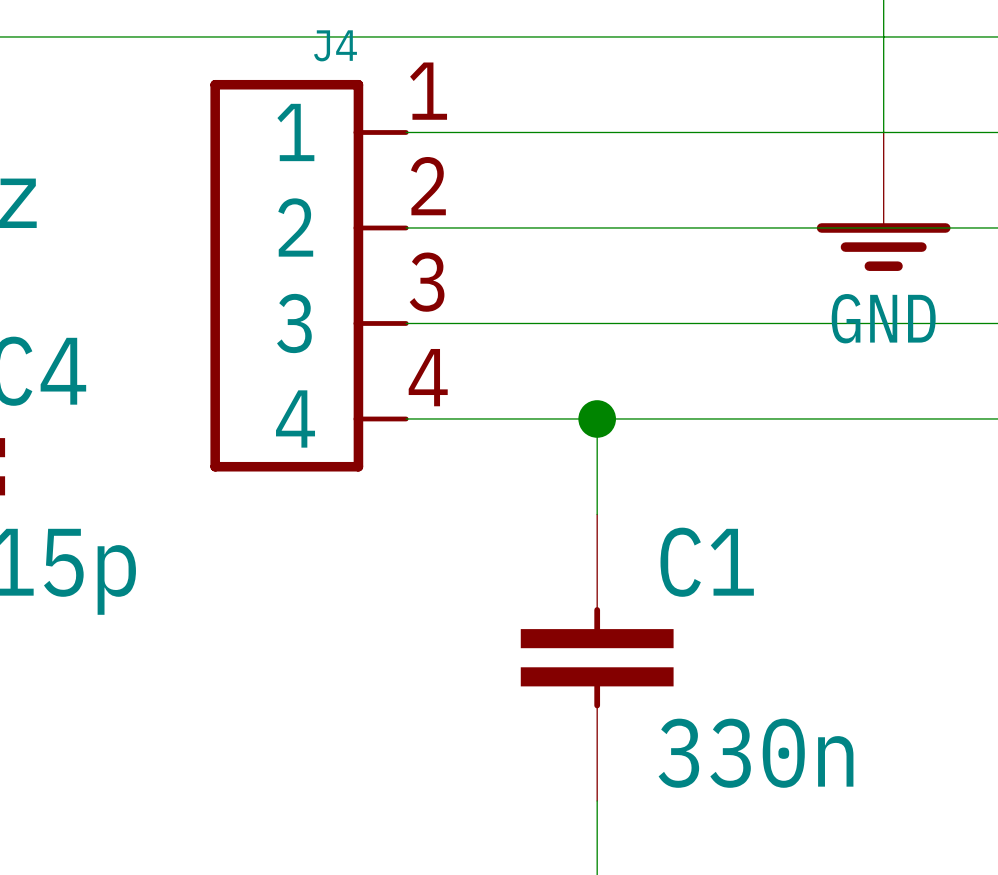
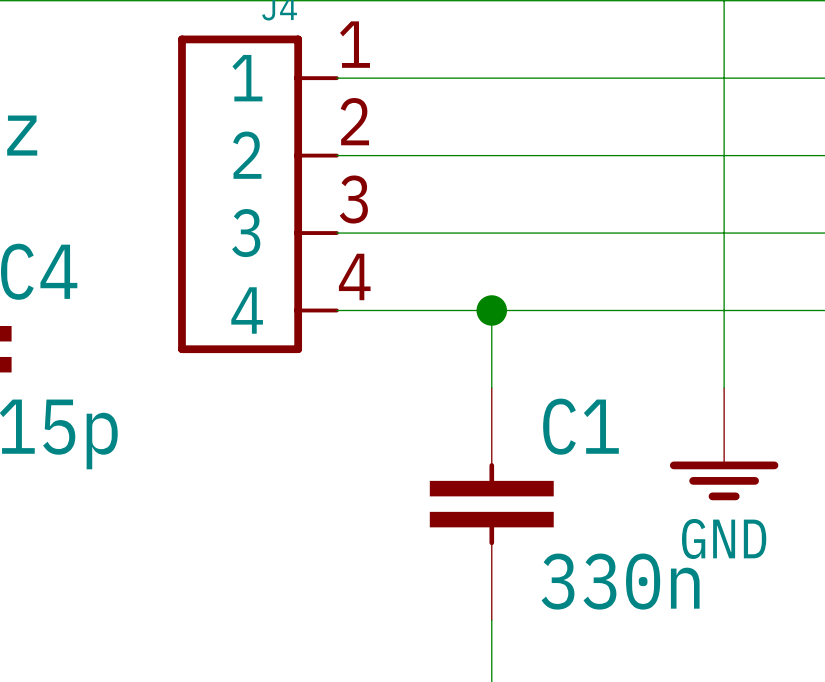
wire: none -> (724, 78) (724, 387)
power symbol position: GND (883, 201) -> GND (724, 444)

